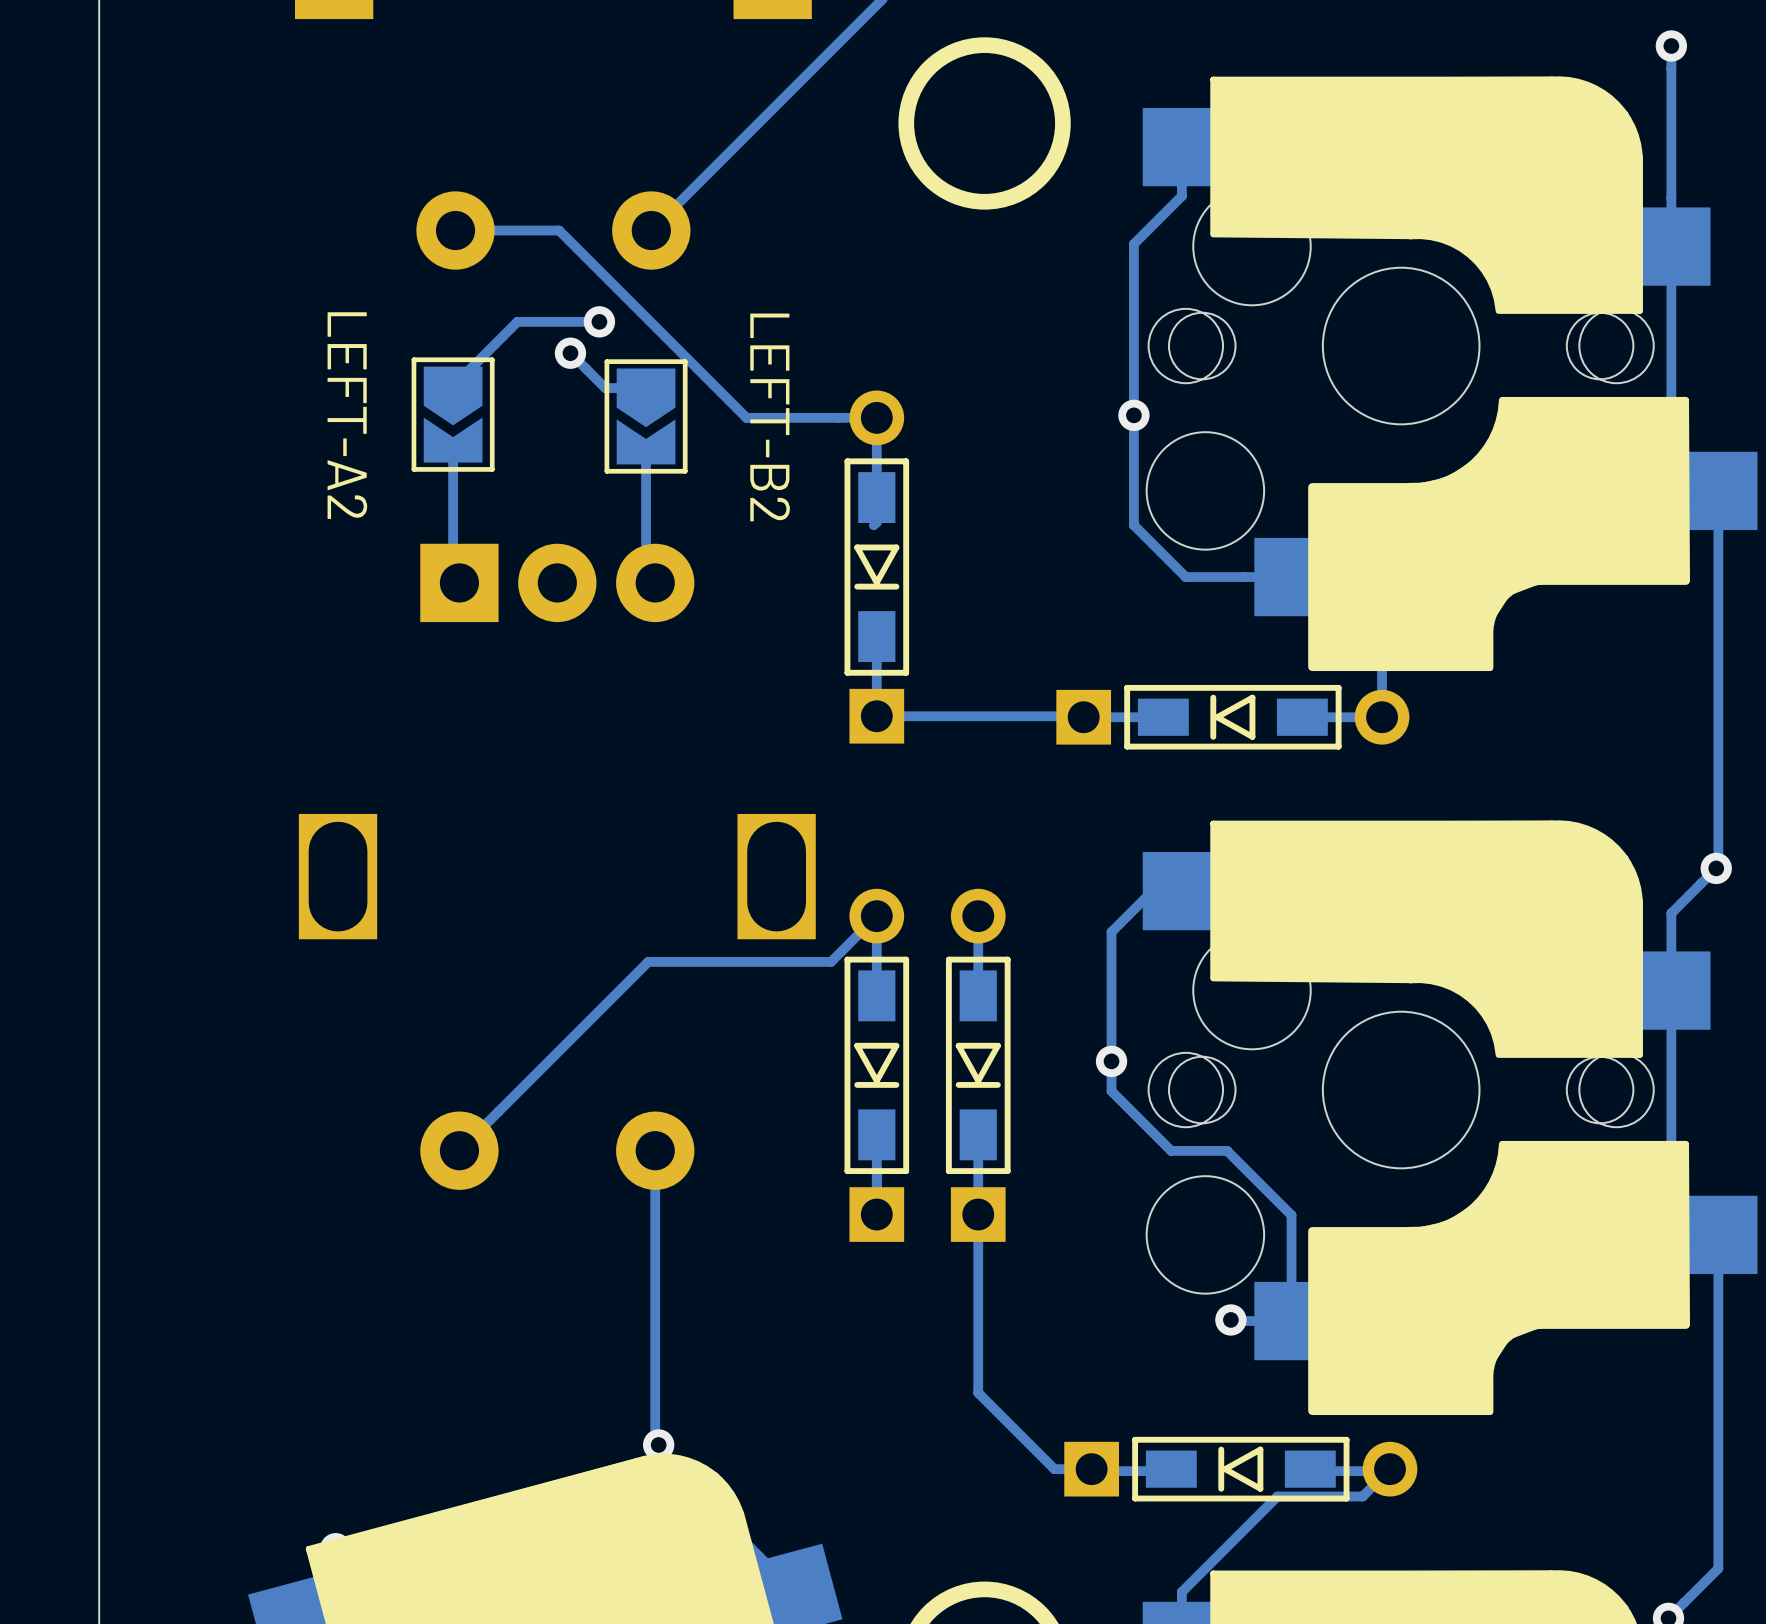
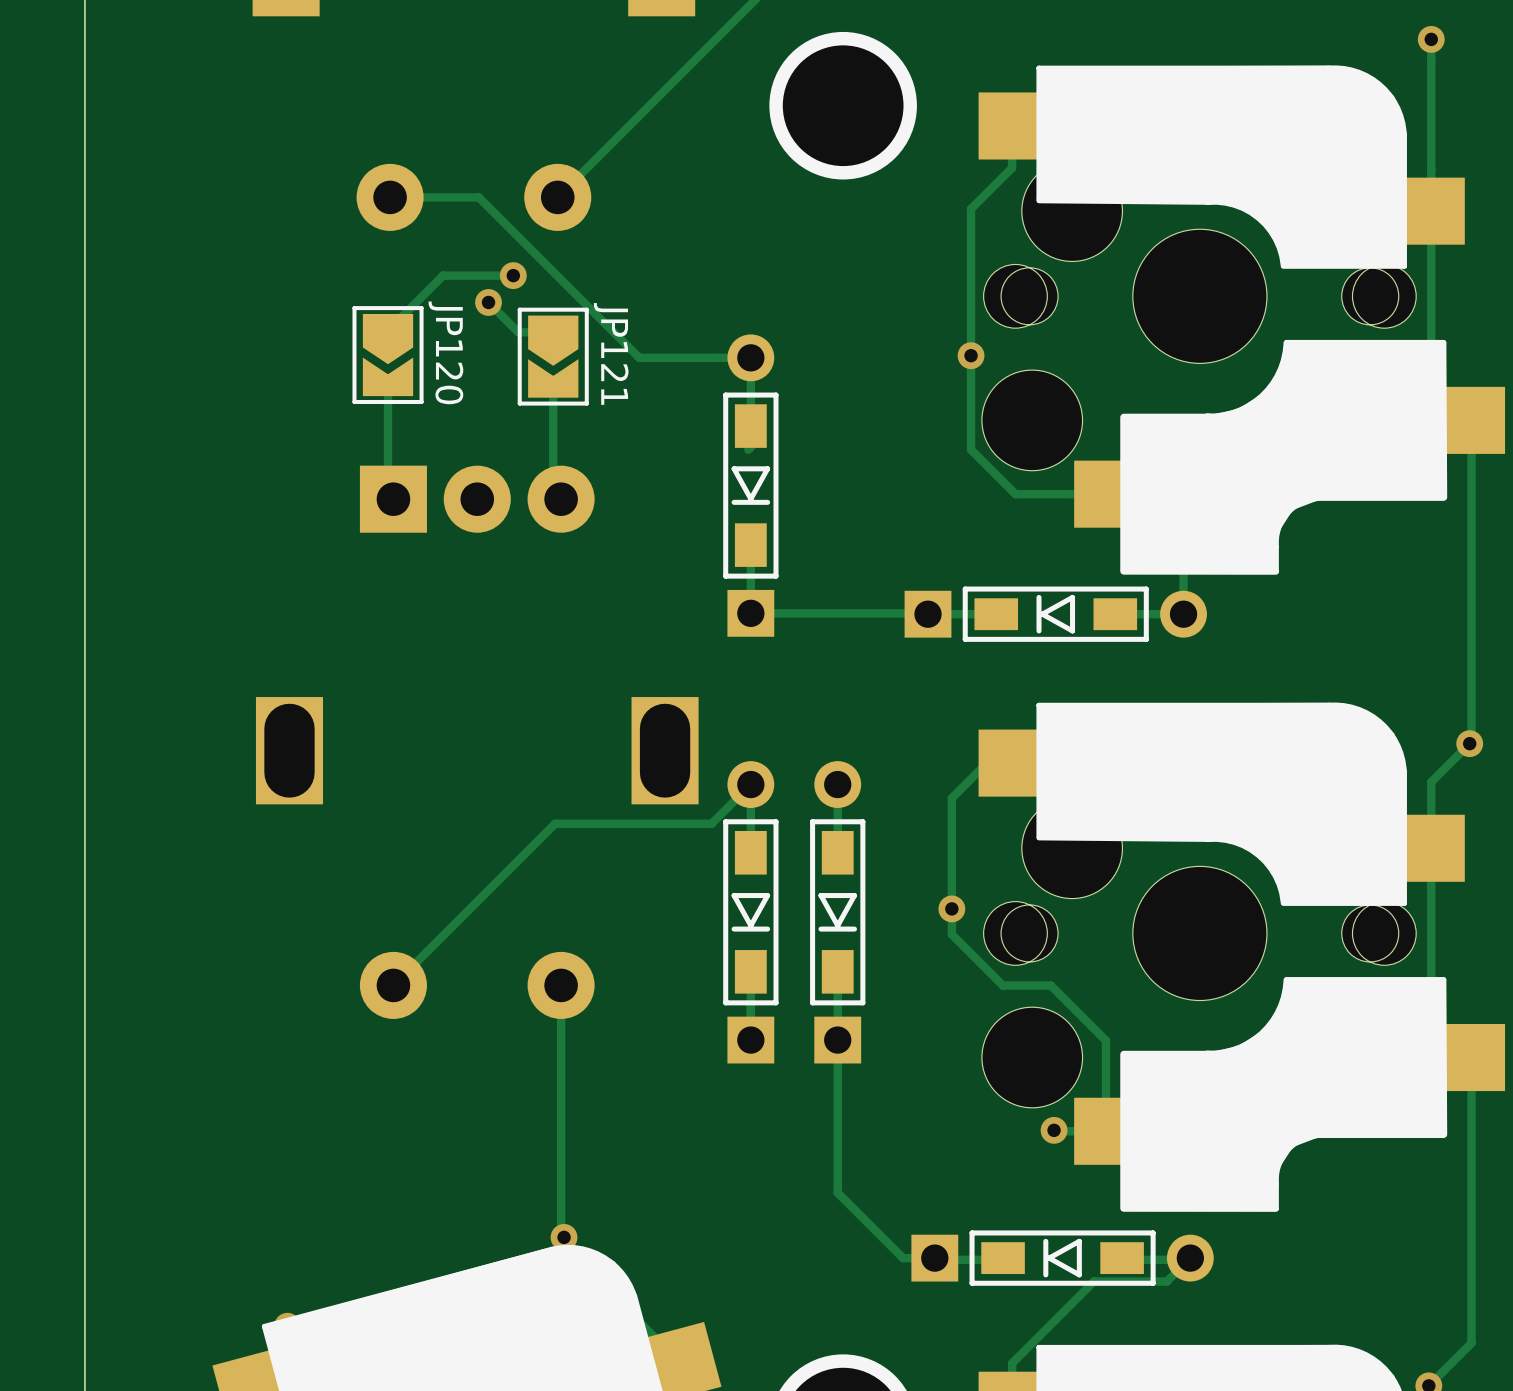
JP120 name: none -> JP120 (445, 352)
JP120 value: LEFT-A2 (347, 415) -> none
JP121 name: none -> JP121 (611, 353)
JP121 value: LEFT-B2 (770, 417) -> none

